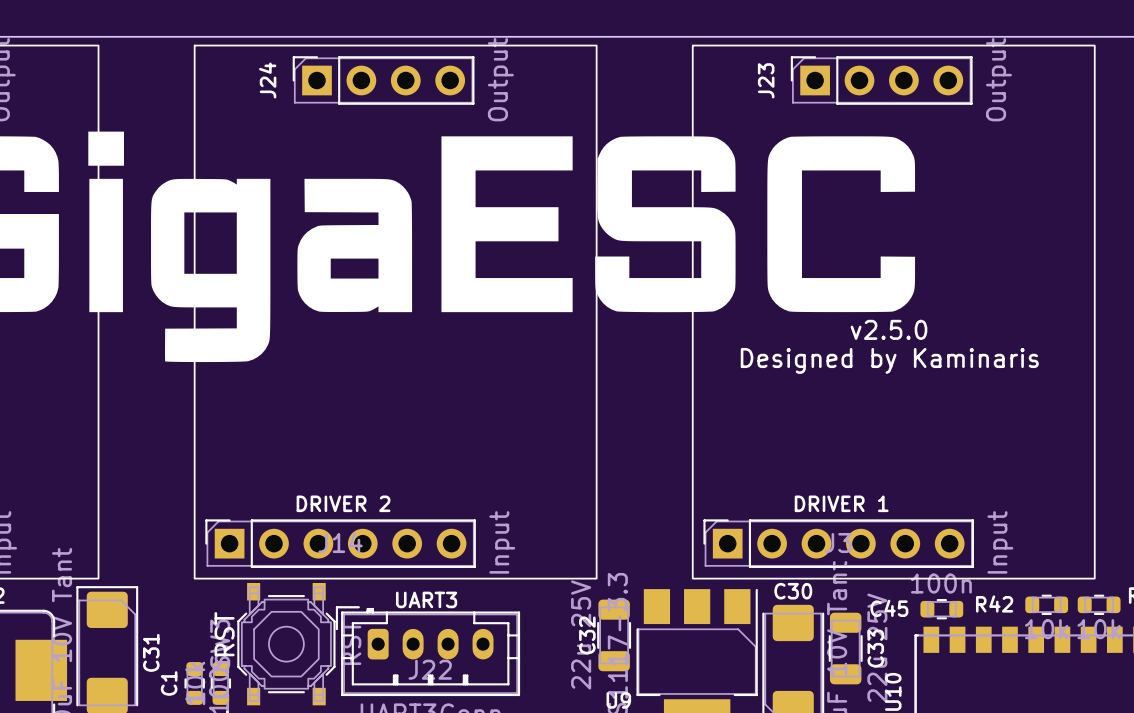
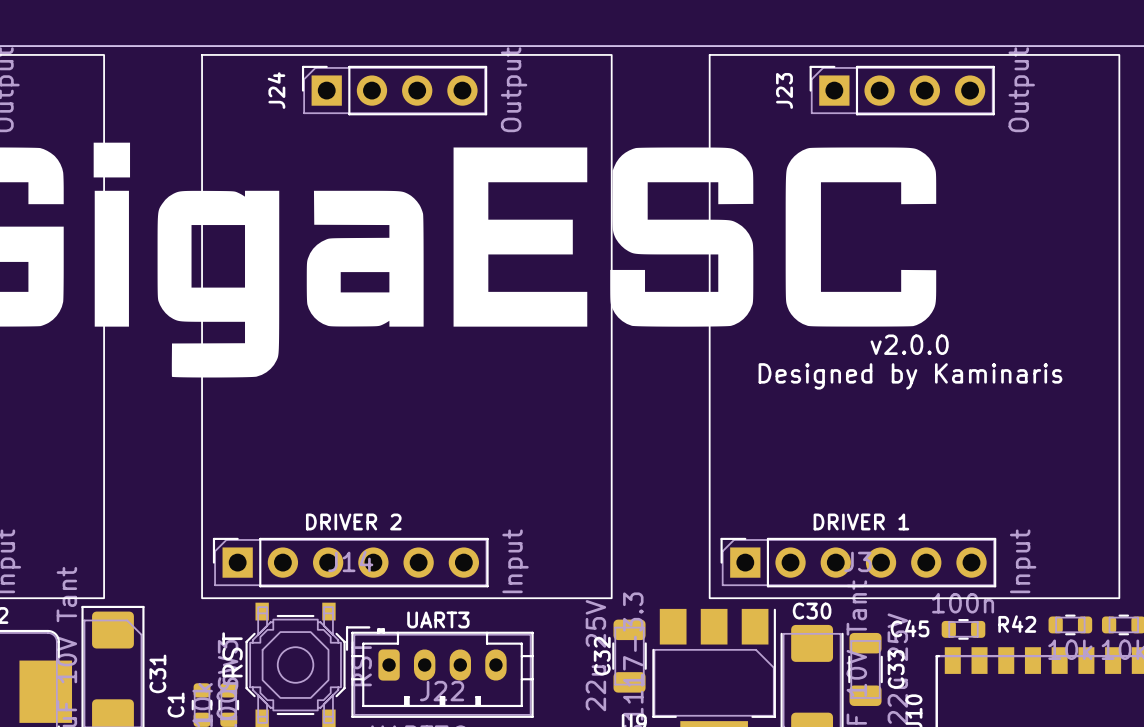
text: v2.5.0 (888, 329) -> v2.0.0 (909, 344)

